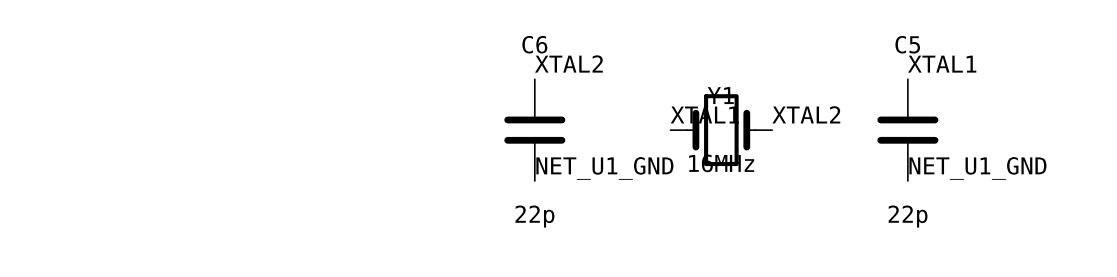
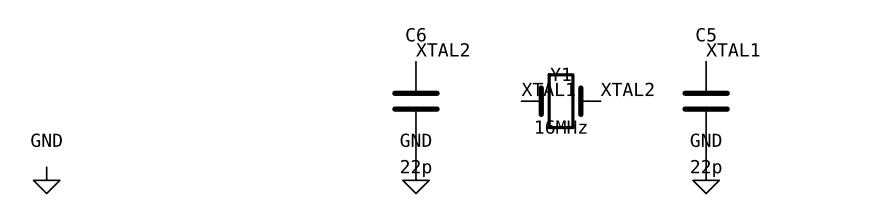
label: NET_U1_GND (604, 168) -> none
label: NET_U1_GND (977, 168) -> none
wire: none -> (415, 140) (415, 167)
wire: none -> (706, 140) (706, 167)
power symbol: none -> GND (46, 180)
power symbol: none -> GND (415, 180)
power symbol: none -> GND (706, 180)

